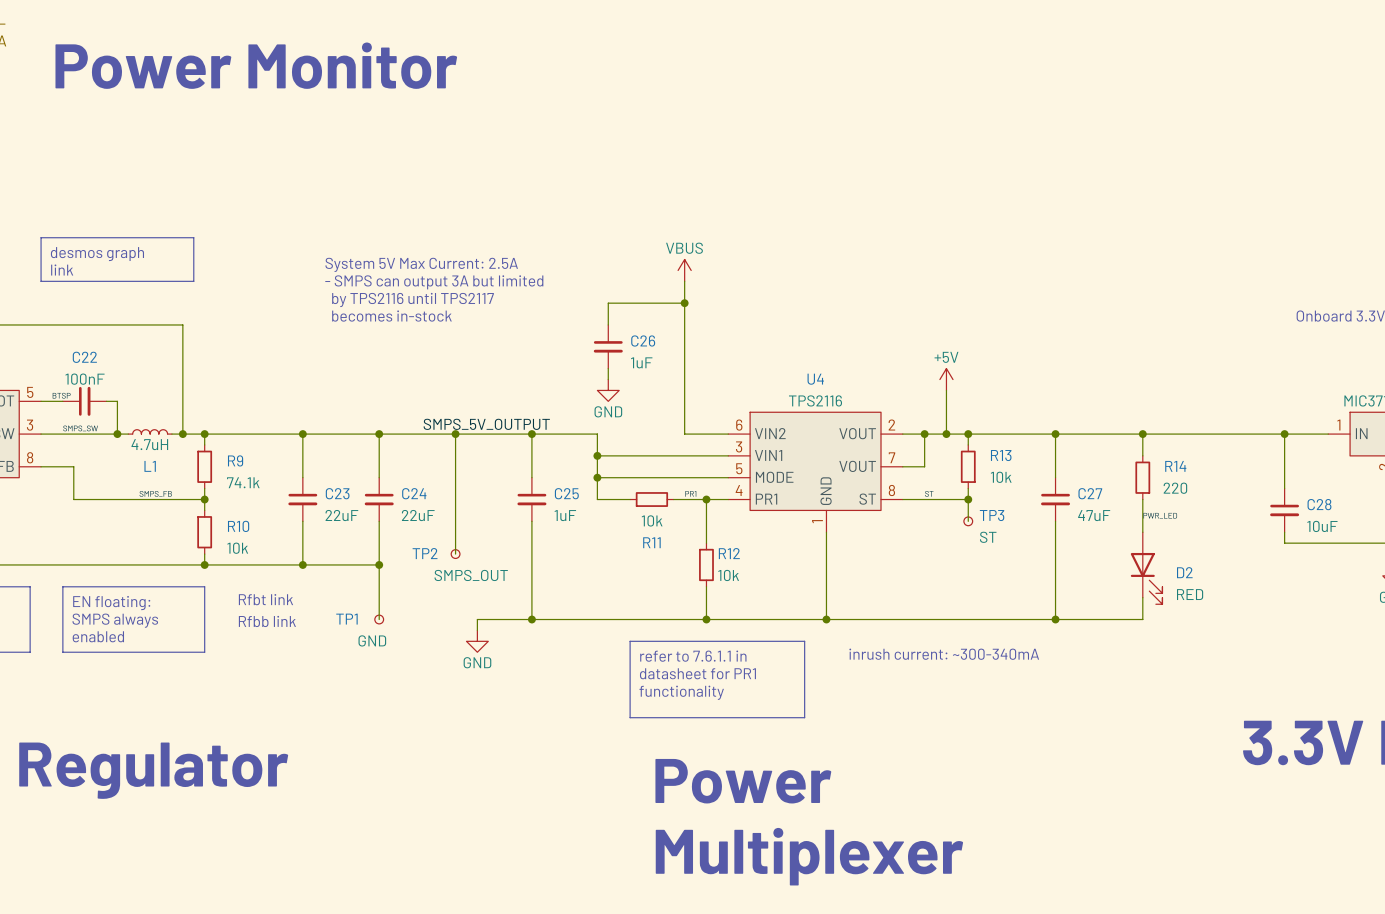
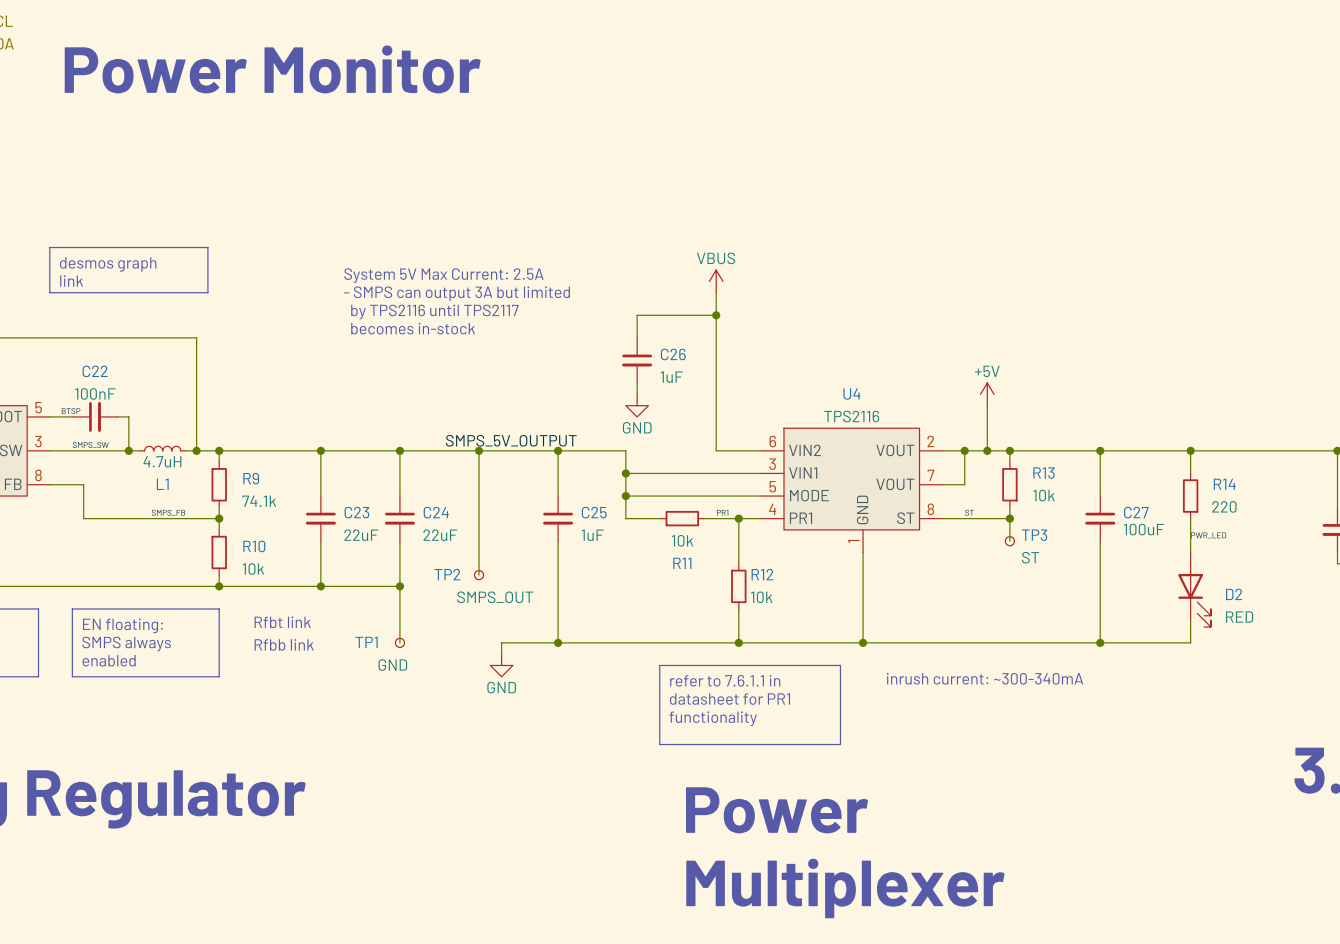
C27 value: 47uF (1094, 515) -> 100uF (1143, 529)

